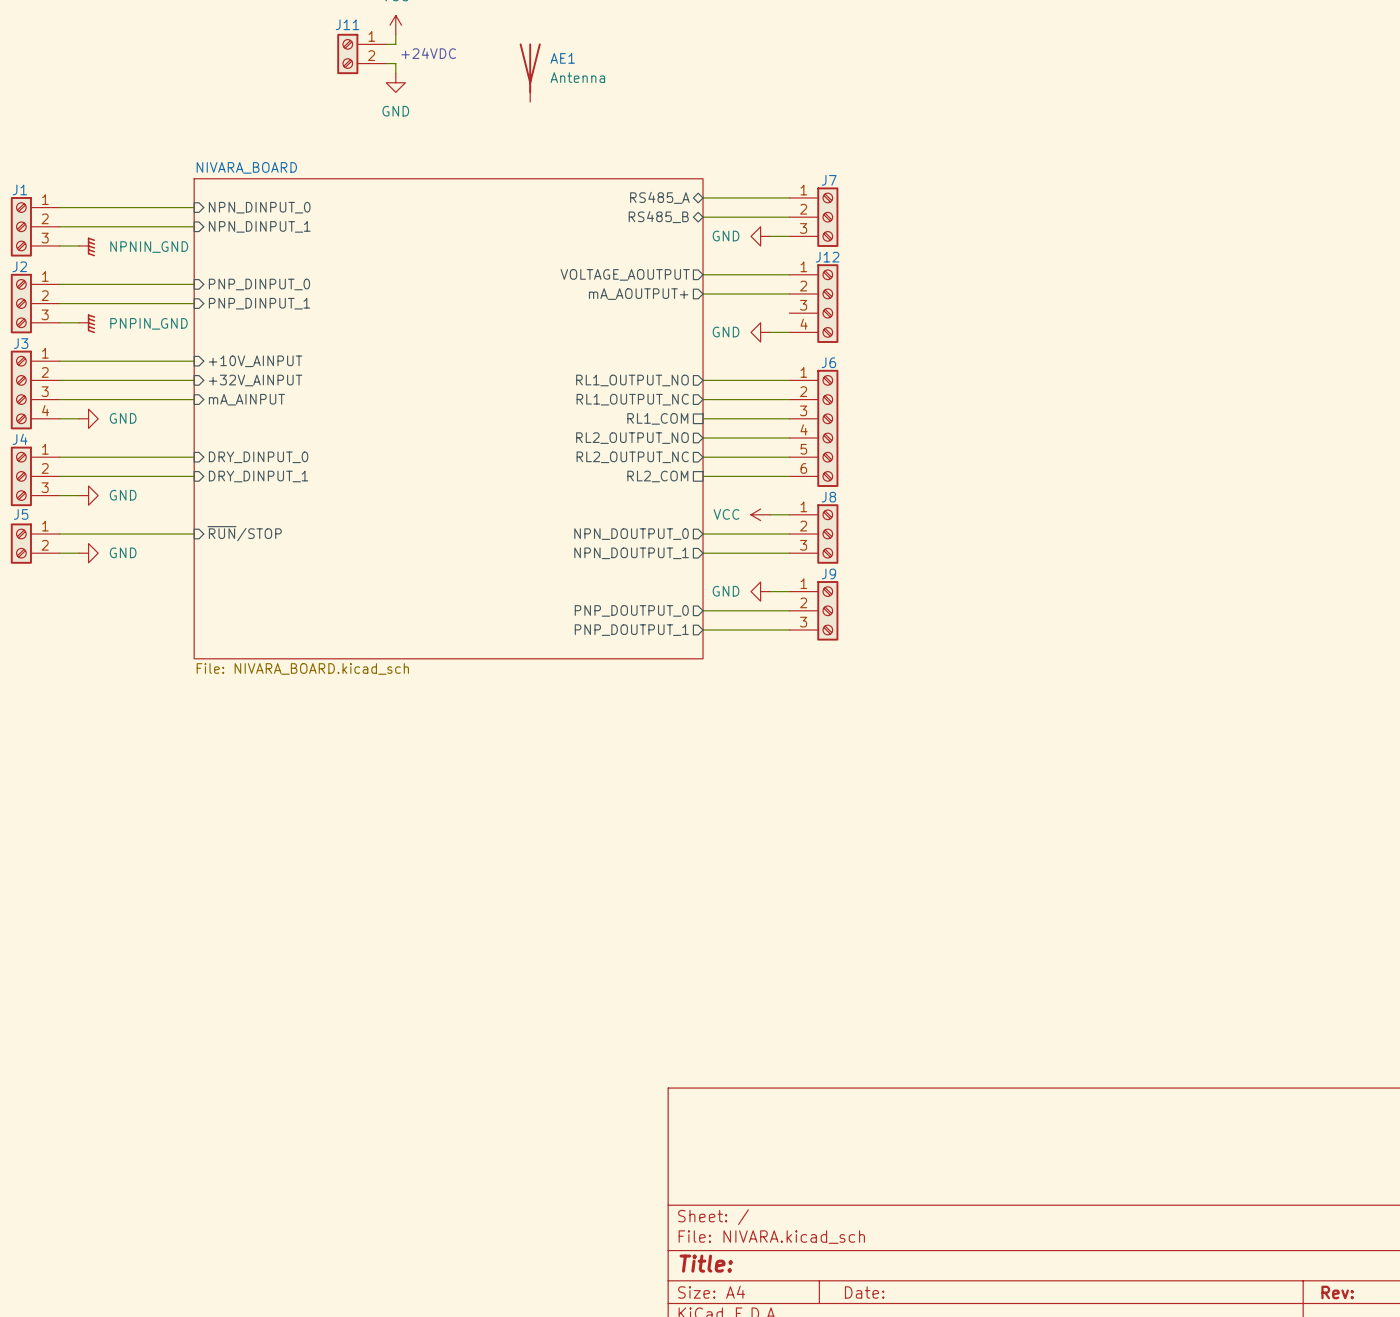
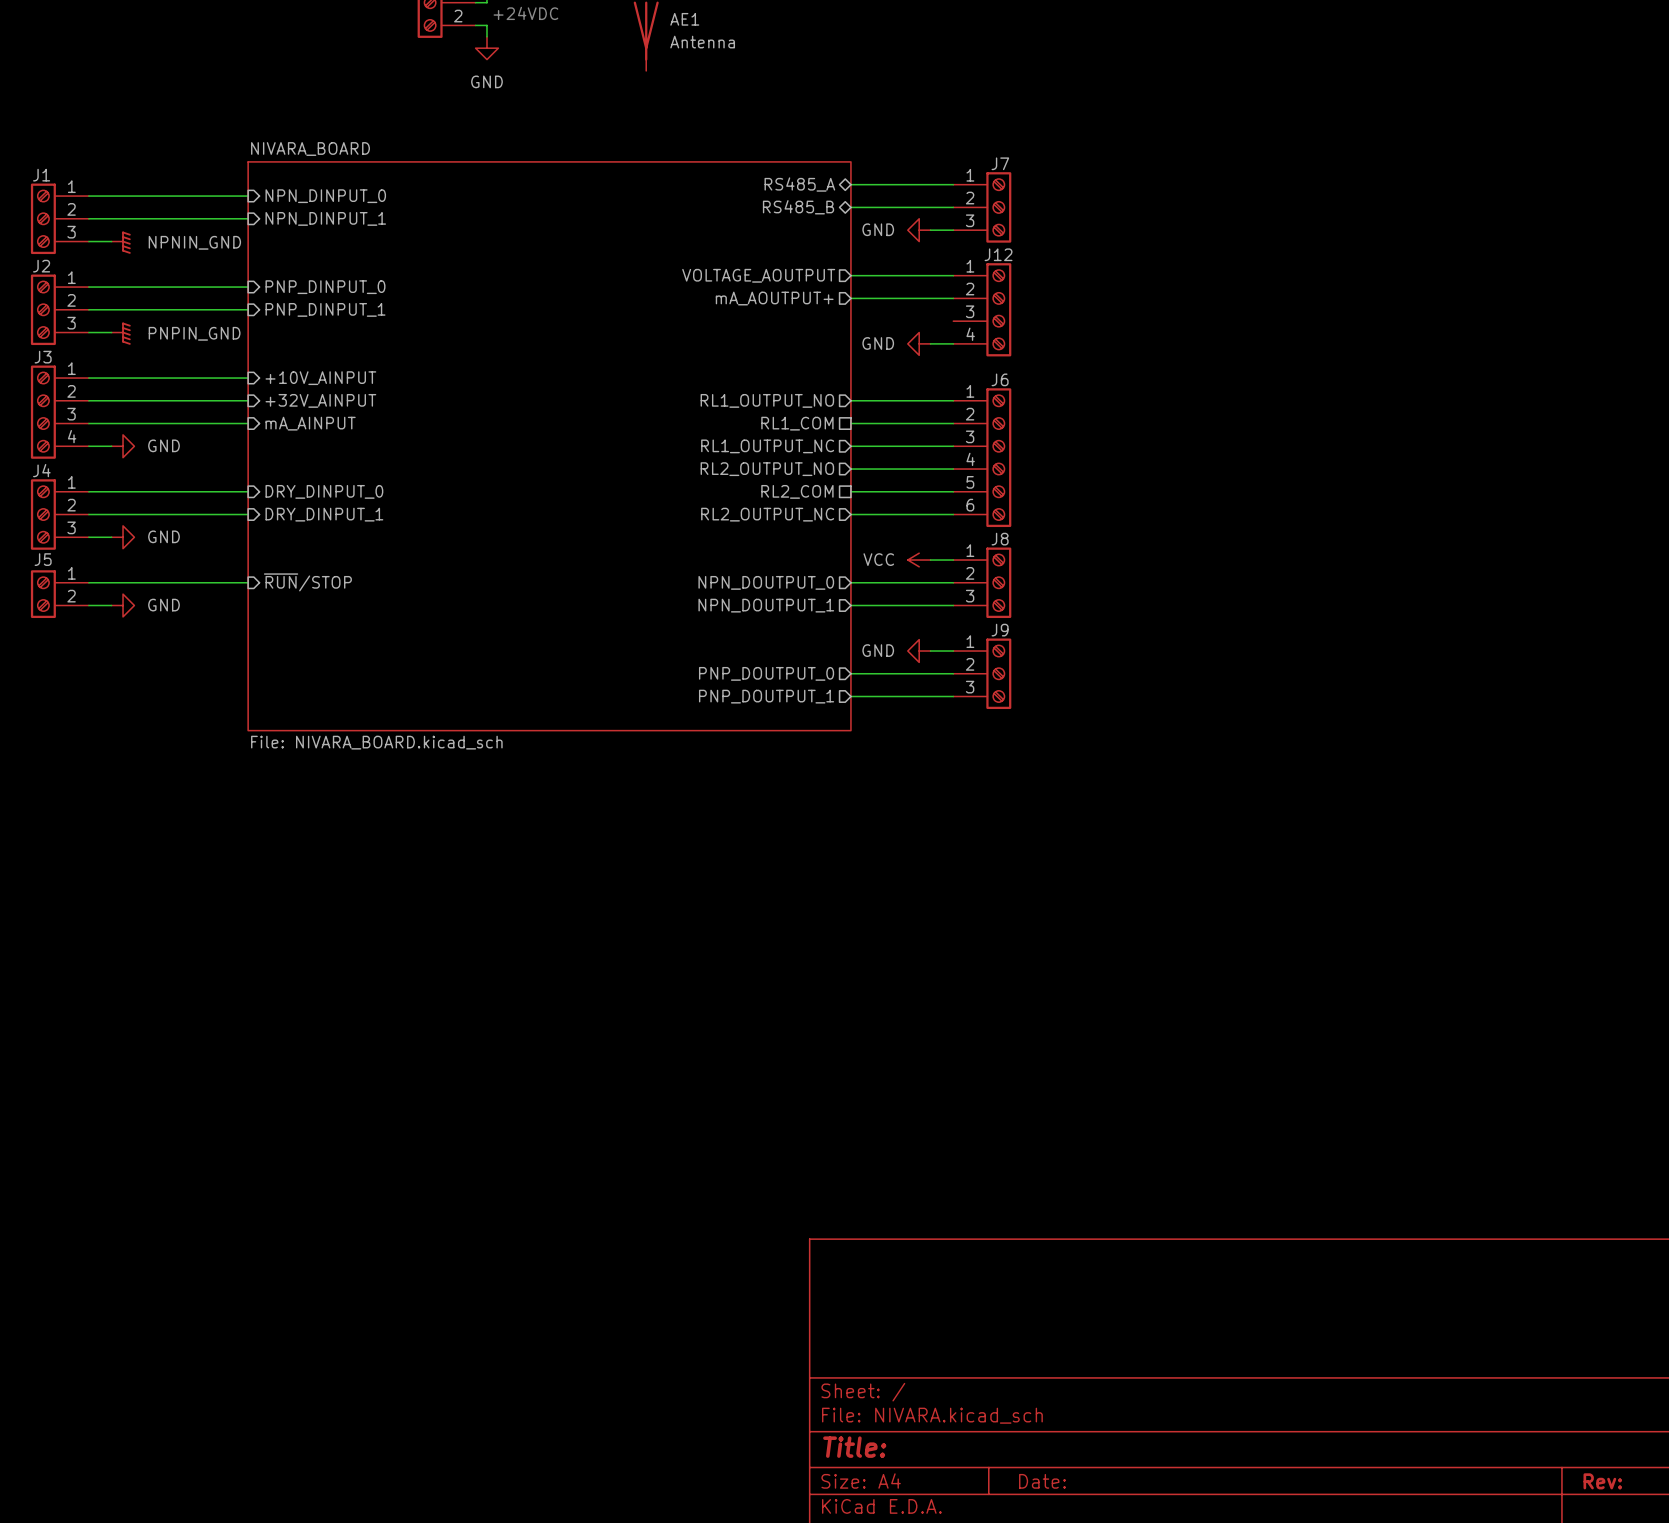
sheet pin shape: output (632, 399) -> passive (797, 423)
sheet pin: RL1_OUTPUT_NC (632, 399) -> RL1_COM (797, 423)
sheet pin shape: passive (657, 418) -> output (767, 446)
sheet pin: RL1_COM (657, 418) -> RL1_OUTPUT_NC (767, 446)
sheet pin shape: output (632, 457) -> passive (797, 491)
sheet pin: RL2_OUTPUT_NC (632, 457) -> RL2_COM (797, 491)
sheet pin shape: passive (657, 476) -> output (767, 514)
sheet pin: RL2_COM (657, 476) -> RL2_OUTPUT_NC (767, 514)

